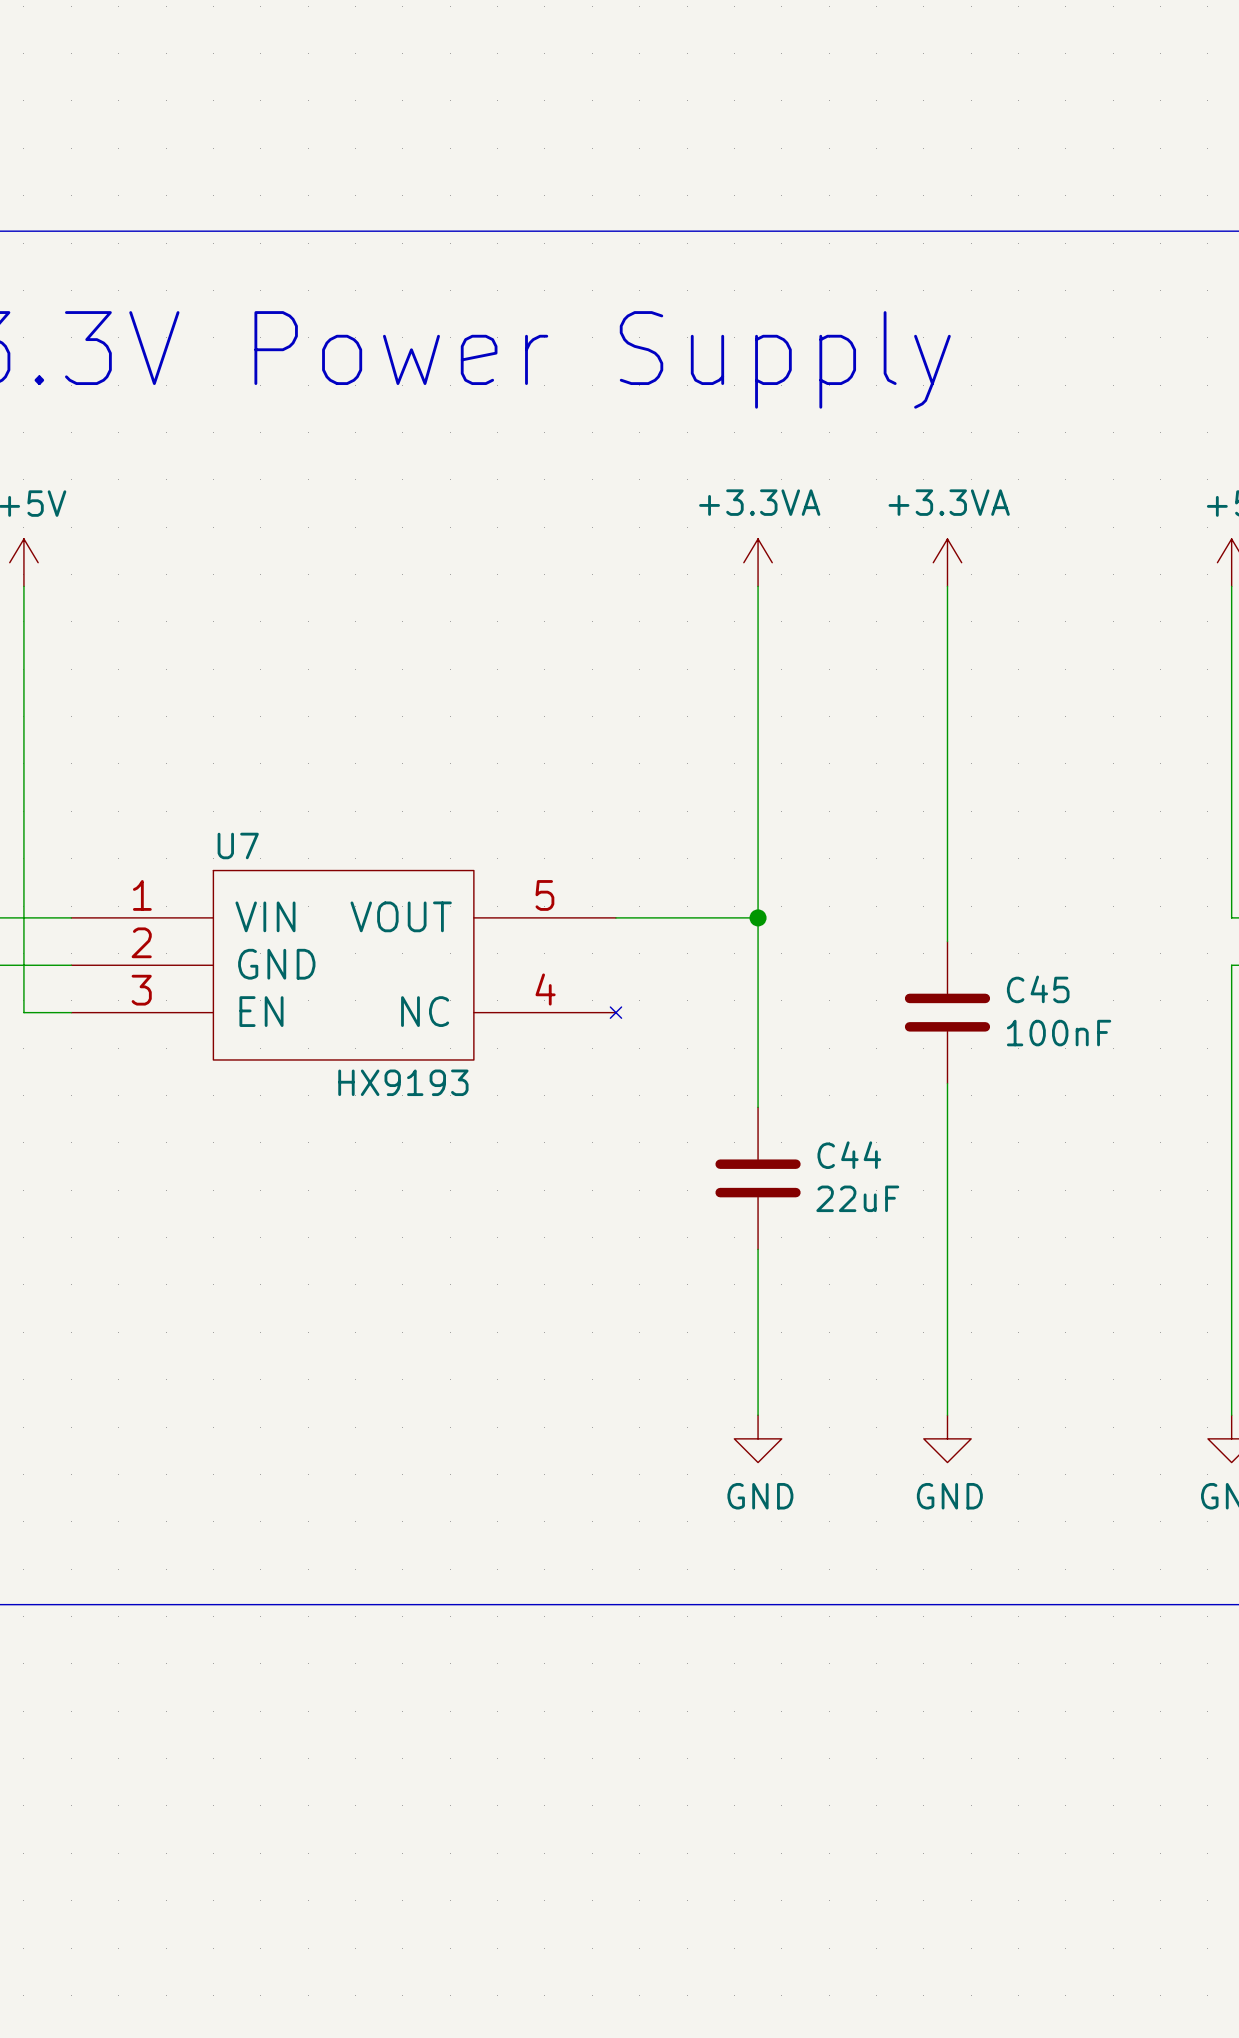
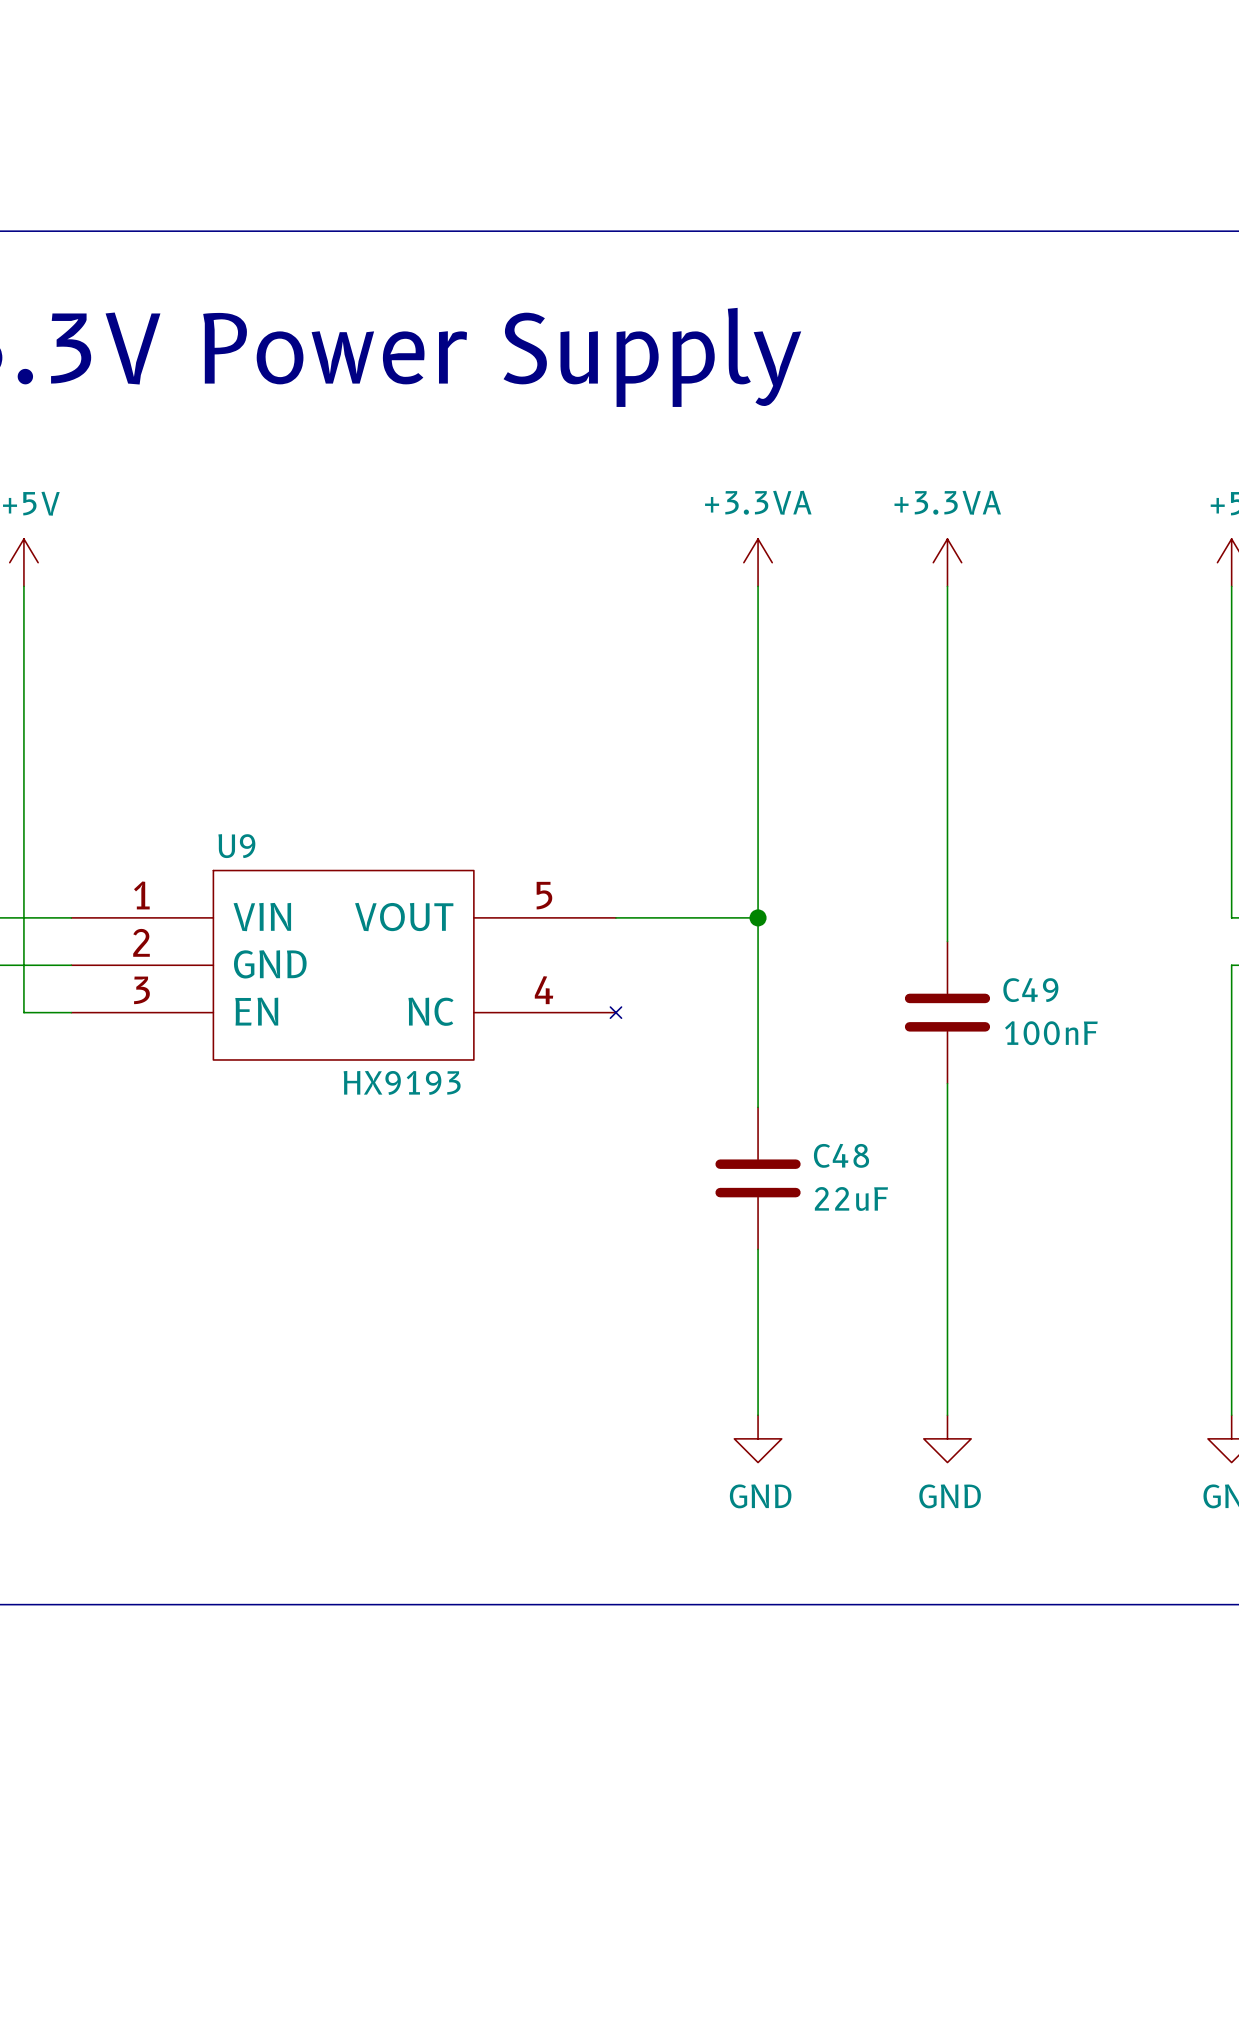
U7 name: U7 (238, 845) -> U9 (236, 846)
C45 name: C45 (1038, 989) -> C49 (1030, 990)
C44 name: C44 (849, 1155) -> C48 (841, 1155)

